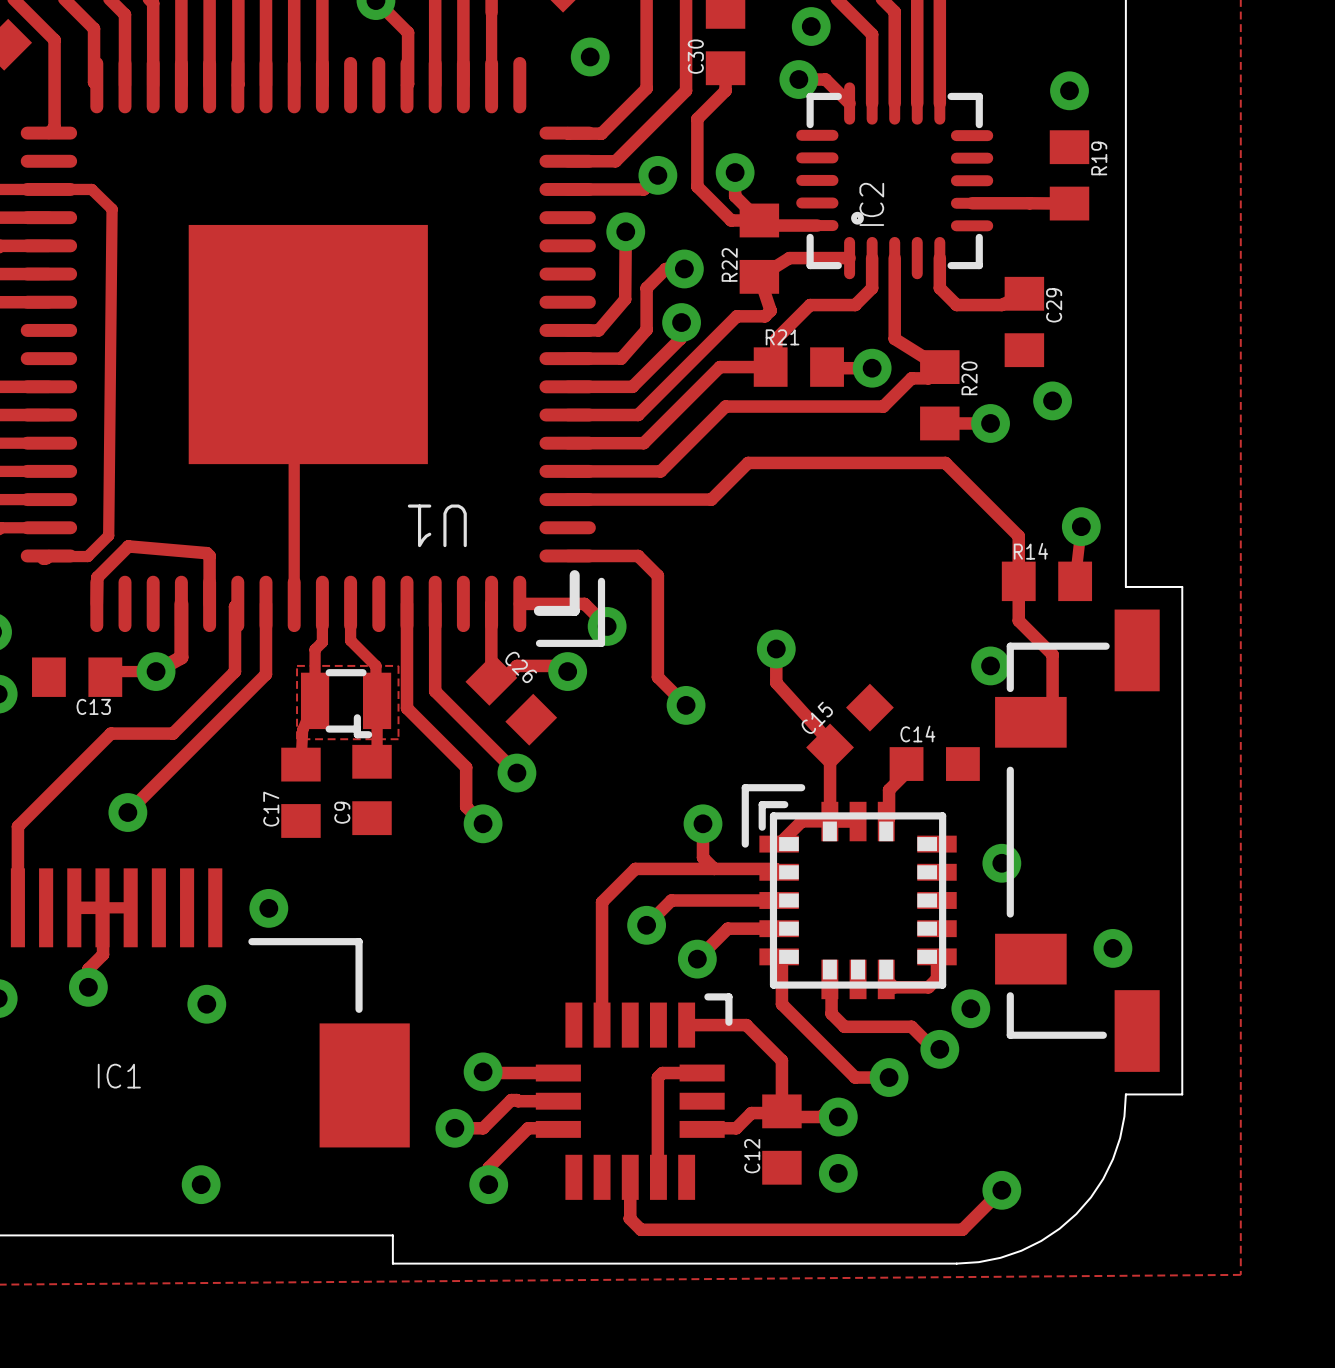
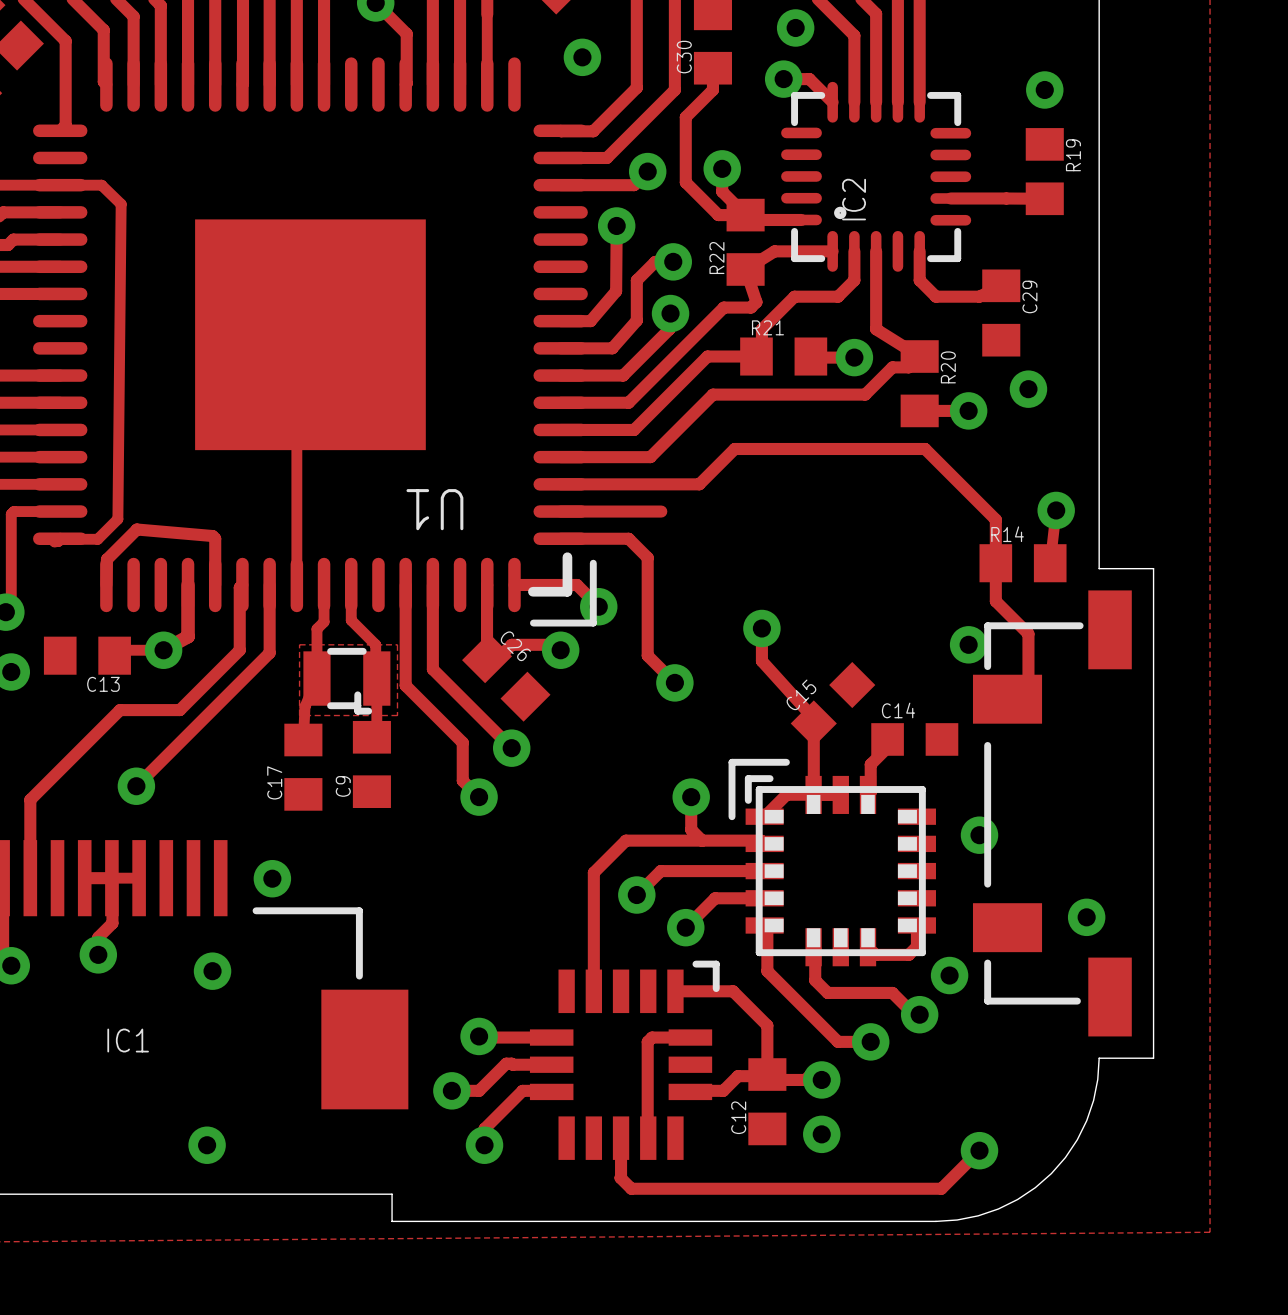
track: none -> (560, 511) (661, 511)

